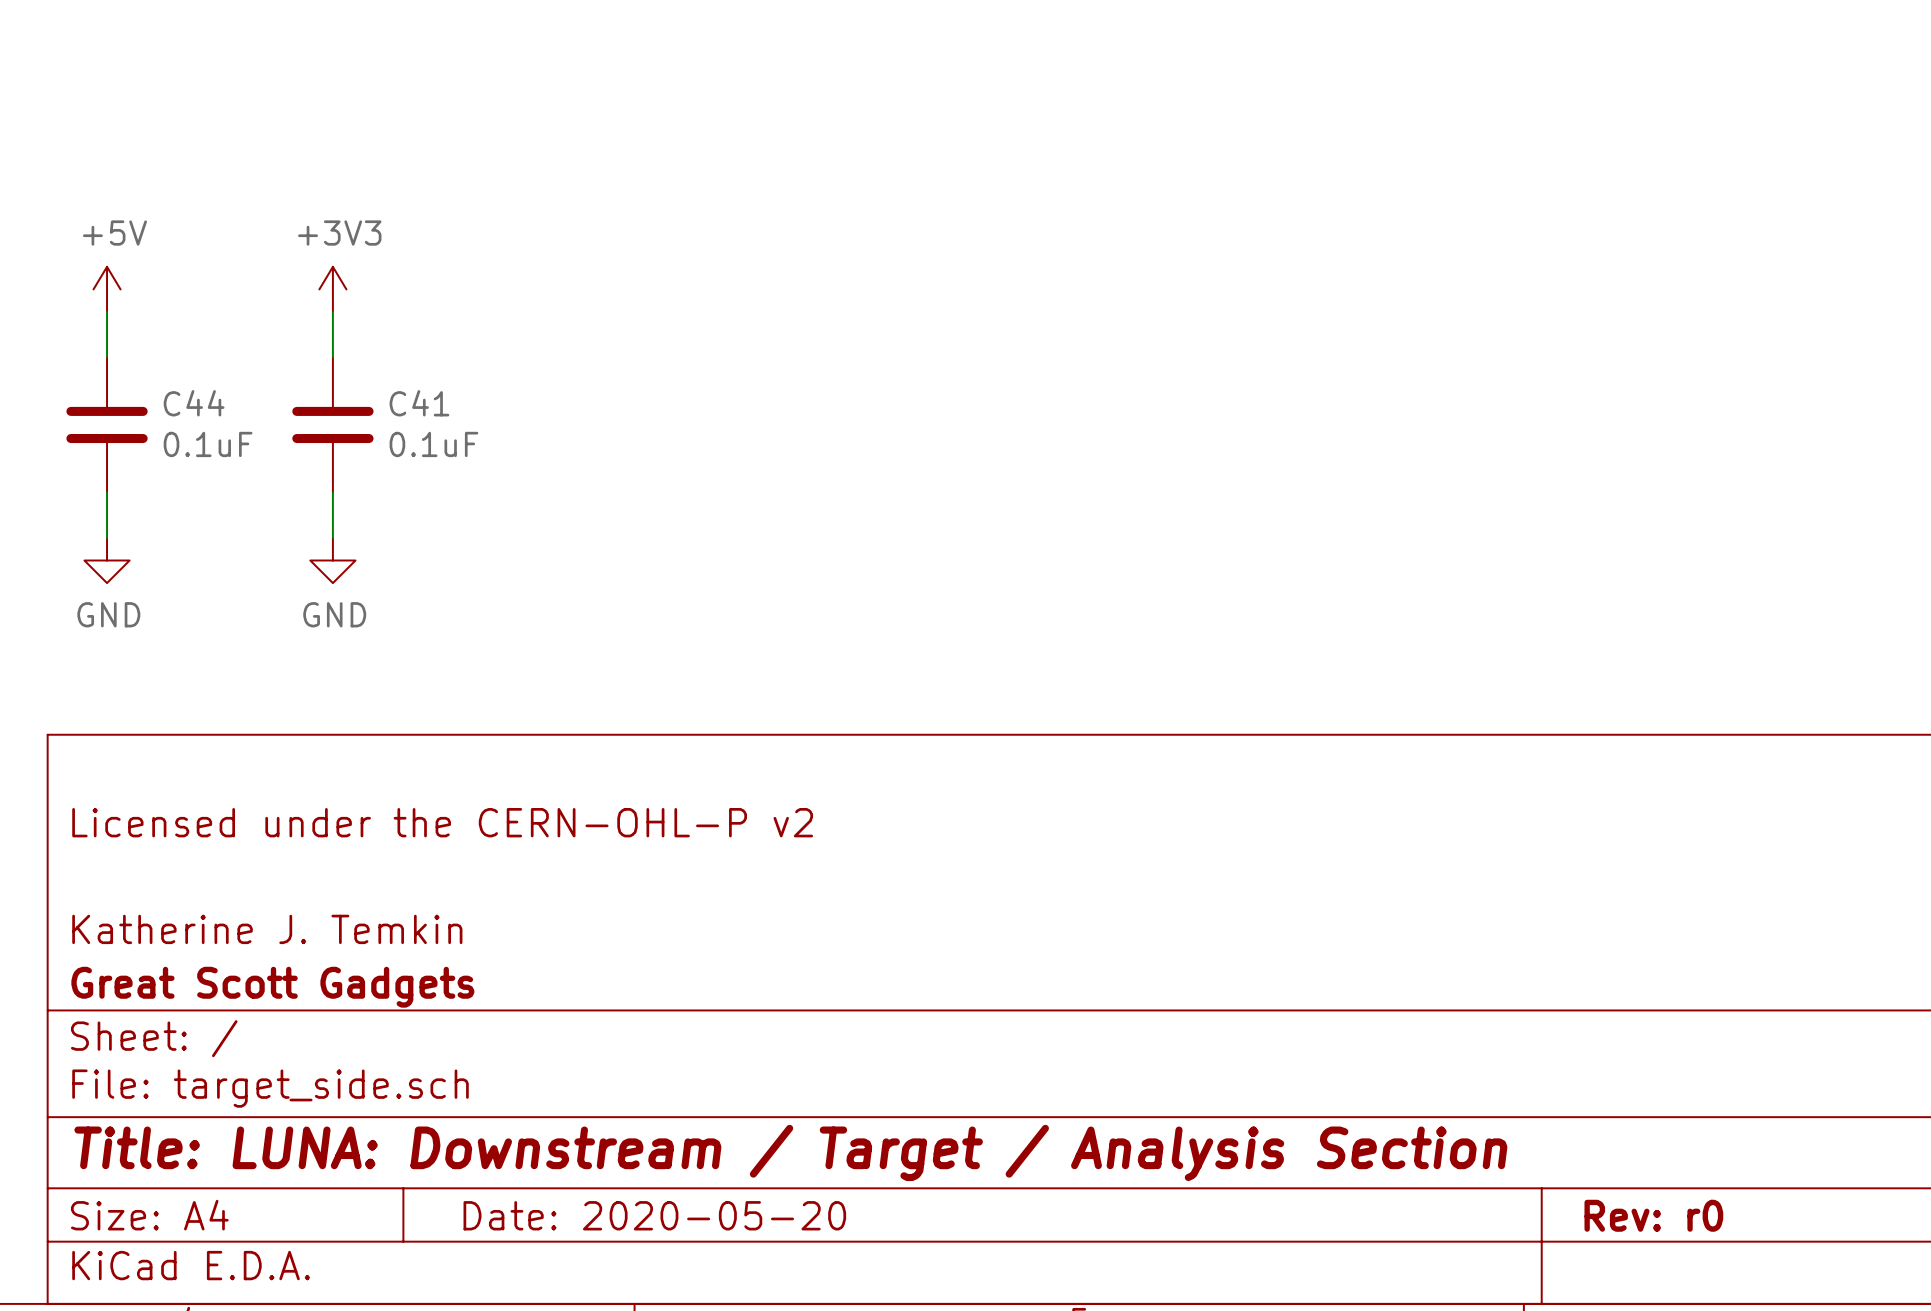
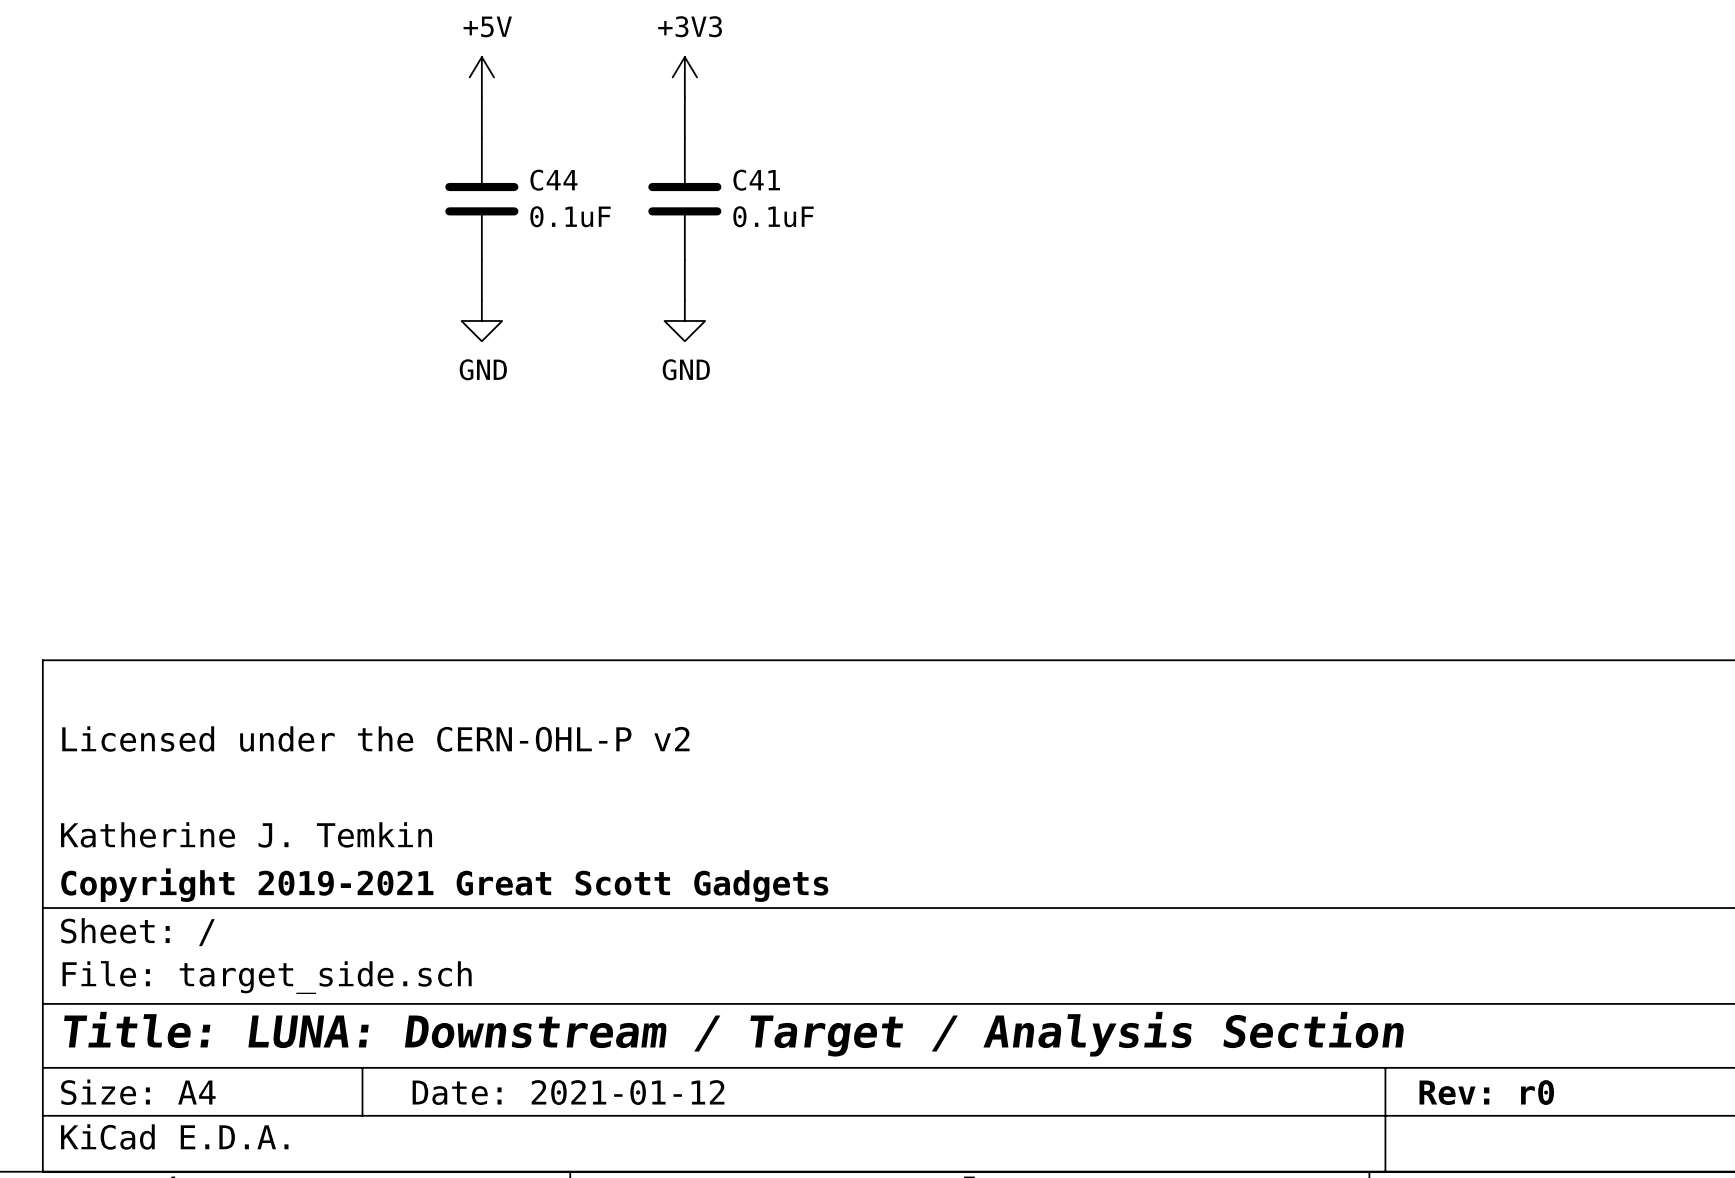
power symbol: none -> +5V (481, 77)
power symbol: none -> +3V3 (684, 77)
wire: none -> (684, 97) (684, 138)
power symbol: +5V (107, 289) -> none
power symbol: +3V3 (332, 289) -> none
wire: none -> (684, 260) (684, 300)
wire: (107, 312) (107, 357) -> none
wire: (332, 312) (332, 357) -> (481, 97) (481, 138)
power symbol: none -> GND (481, 320)
power symbol: none -> GND (684, 320)
C44 position: (107, 424) -> (481, 199)
C41 position: (332, 424) -> (684, 199)
wire: (107, 492) (107, 537) -> none
wire: (332, 492) (332, 537) -> (481, 260) (481, 300)
power symbol: GND (107, 560) -> none
power symbol: GND (332, 560) -> none
title block: Great Scott Gadgets (272, 987) -> Copyright 2019-2021 Great Scott Gadgets (444, 885)
title block: Date: 2020-05-20 (654, 1215) -> Date: 2021-01-12 (568, 1092)

